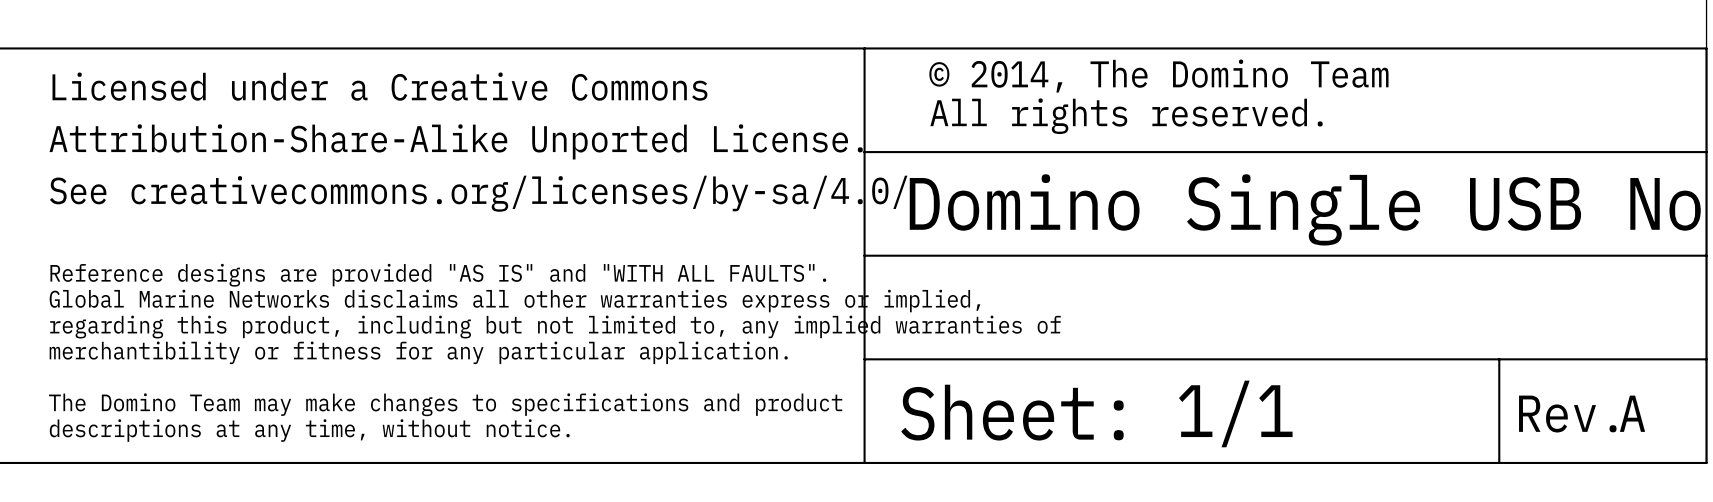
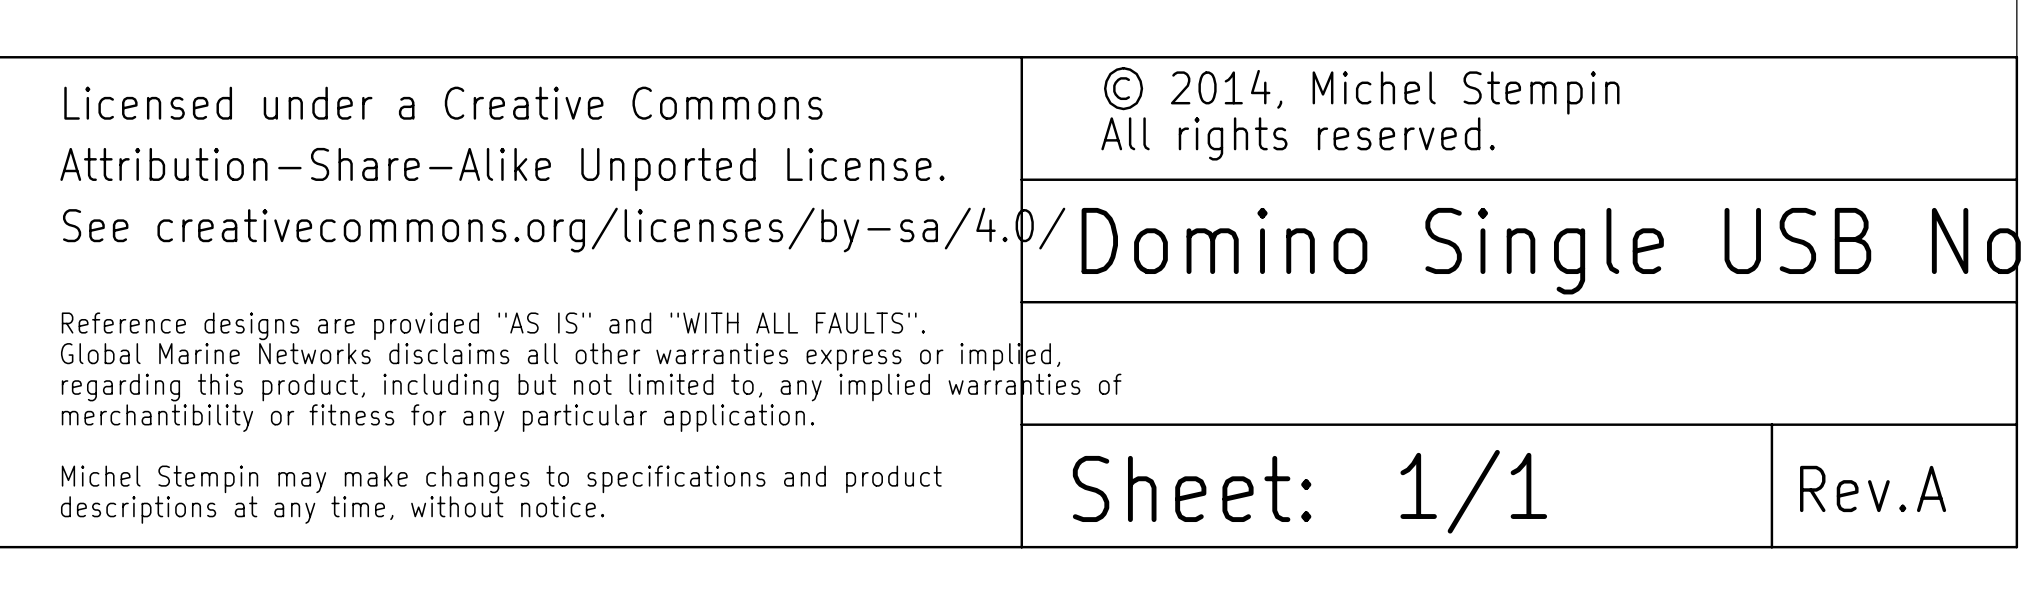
text: © 2014, The Domino Team (1158, 76) -> © 2014, Michel Stempin (1361, 90)
text: The Domino Team may make changes to specifications and product (445, 404) -> Michel Stempin may make changes to specifications and product (501, 479)

